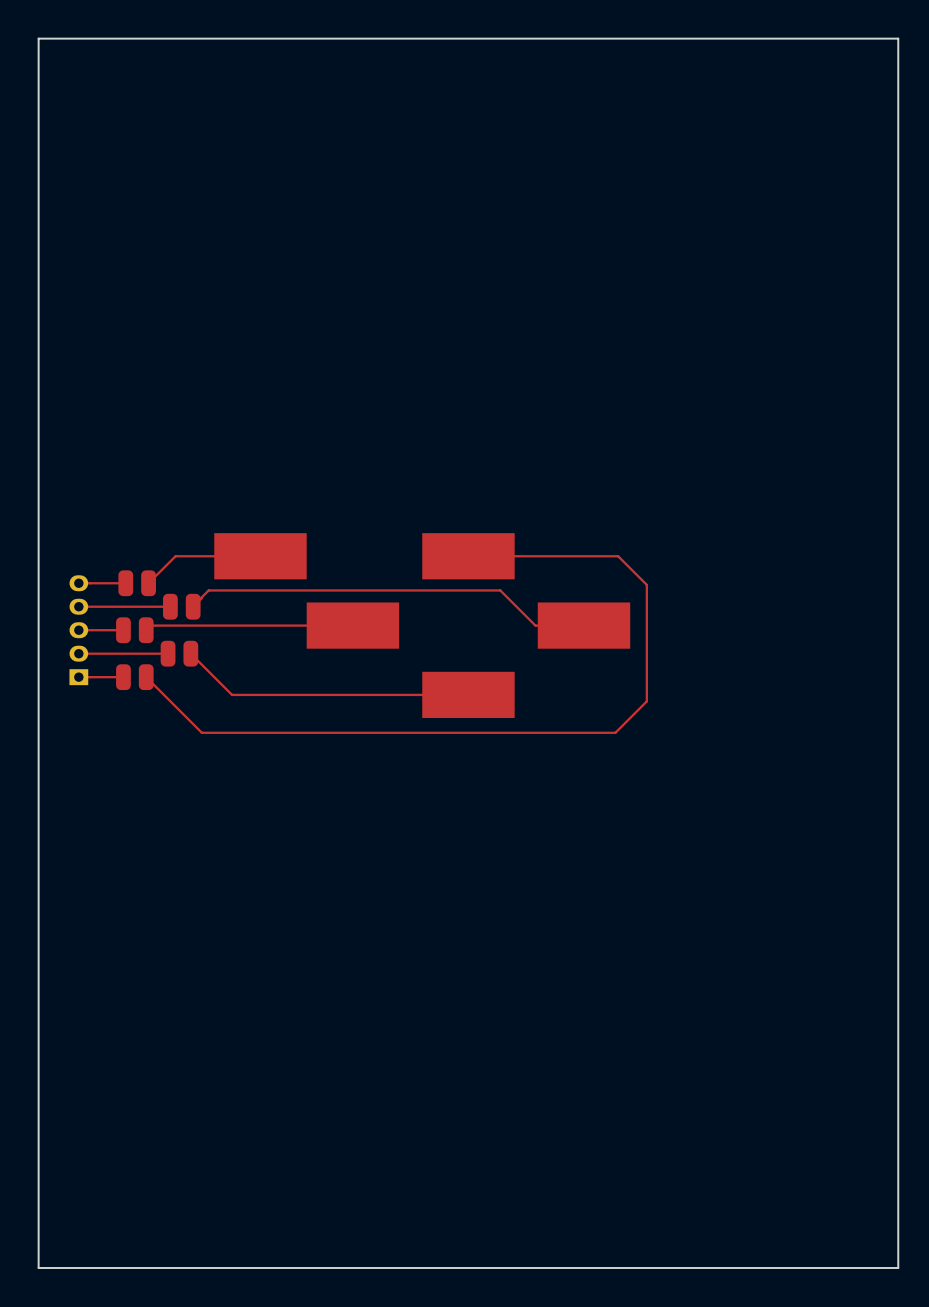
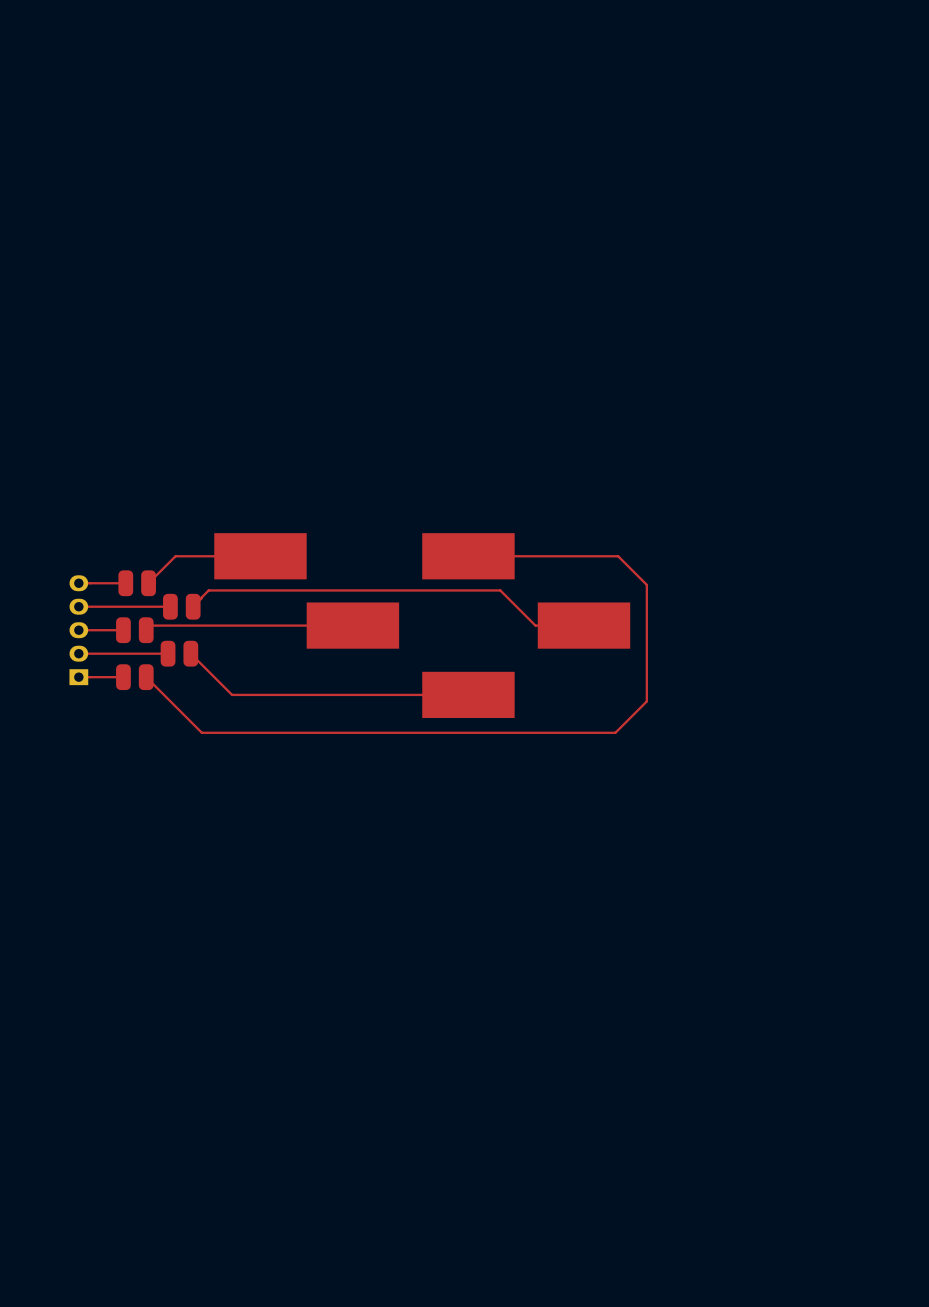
board edge: (898, 38) (38, 38) (38, 1268) (898, 1268) (898, 38) -> none

